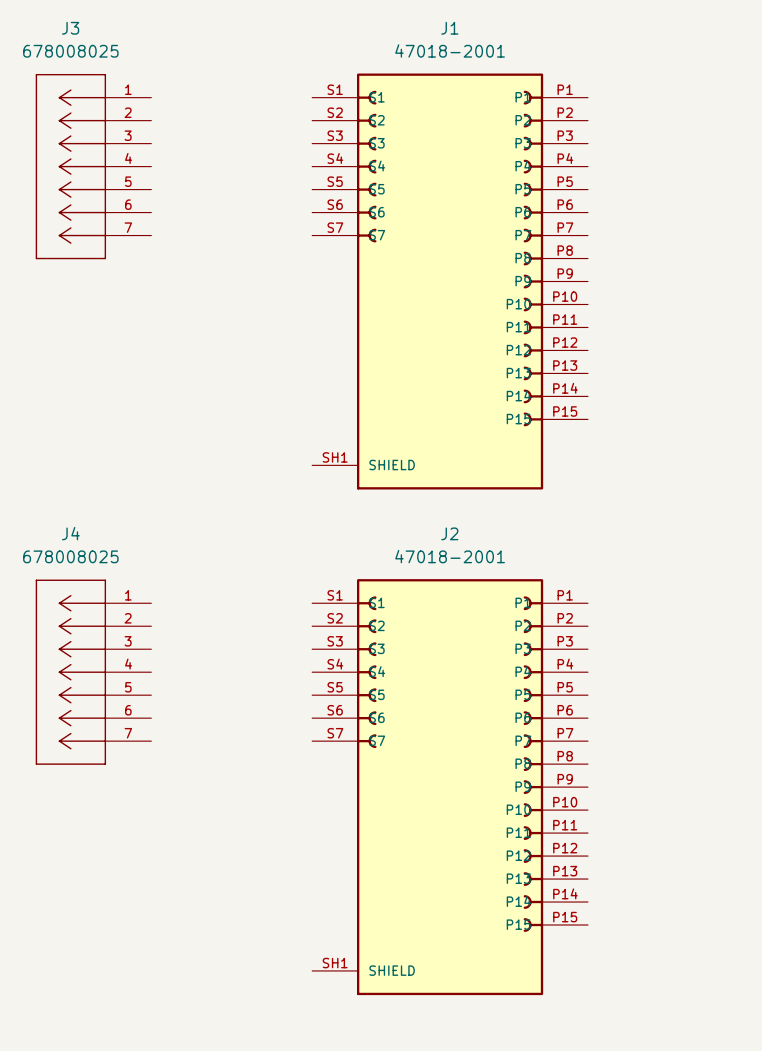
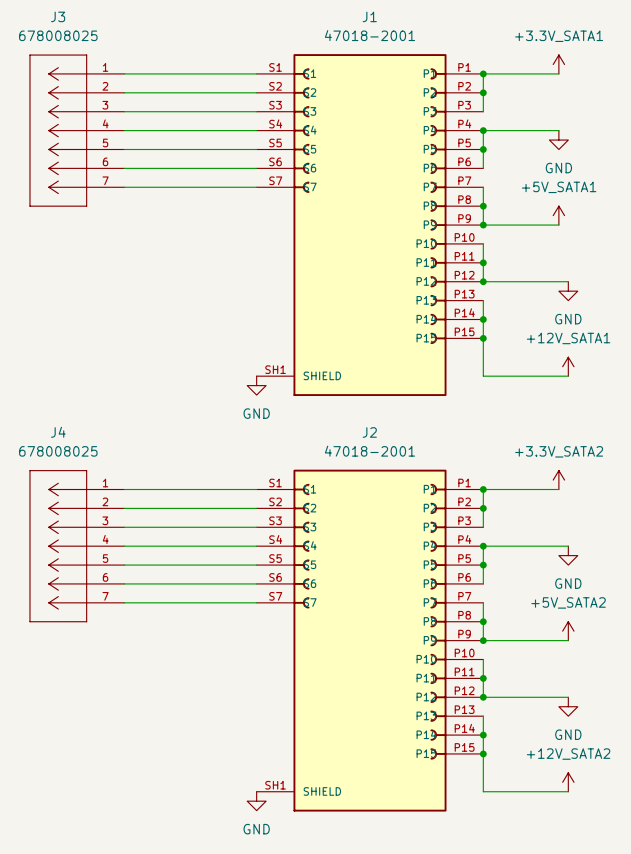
power symbol: none -> +3.3V_SATA1 (558, 64)
wire: none -> (124, 73) (256, 73)
junction: none -> (483, 73)
wire: none -> (558, 73) (483, 73) (483, 111)
wire: none -> (124, 92) (256, 92)
junction: none -> (483, 92)
wire: none -> (124, 111) (256, 111)
wire: none -> (124, 130) (256, 130)
junction: none -> (483, 130)
wire: none -> (558, 130) (483, 130) (483, 168)
power symbol: none -> GND (558, 140)
wire: none -> (124, 149) (256, 149)
junction: none -> (483, 149)
wire: none -> (124, 168) (256, 168)
wire: none -> (124, 187) (256, 187)
wire: none -> (483, 187) (483, 225) (558, 225)
junction: none -> (483, 206)
power symbol: none -> +5V_SATA1 (558, 215)
junction: none -> (483, 225)
wire: none -> (483, 243) (483, 281) (568, 281)
junction: none -> (483, 262)
junction: none -> (483, 281)
power symbol: none -> GND (568, 291)
wire: none -> (483, 300) (483, 376) (568, 376)
junction: none -> (483, 319)
junction: none -> (483, 338)
power symbol: none -> +12V_SATA1 (568, 366)
power symbol: none -> GND (256, 385)
power symbol: none -> +3.3V_SATA2 (558, 480)
wire: none -> (124, 489) (256, 489)
junction: none -> (483, 489)
wire: none -> (558, 489) (483, 489) (483, 527)
wire: none -> (124, 508) (256, 508)
junction: none -> (483, 508)
wire: none -> (124, 527) (256, 527)
wire: none -> (124, 546) (256, 546)
junction: none -> (483, 546)
wire: none -> (568, 546) (483, 546) (483, 583)
power symbol: none -> GND (568, 555)
wire: none -> (124, 565) (256, 565)
junction: none -> (483, 565)
wire: none -> (124, 583) (256, 583)
wire: none -> (124, 602) (256, 602)
wire: none -> (483, 602) (483, 640) (568, 640)
junction: none -> (483, 621)
power symbol: none -> +5V_SATA2 (568, 631)
junction: none -> (483, 640)
wire: none -> (483, 659) (483, 697) (568, 697)
junction: none -> (483, 678)
junction: none -> (483, 697)
power symbol: none -> GND (568, 706)
wire: none -> (483, 716) (483, 791) (568, 791)
junction: none -> (483, 735)
junction: none -> (483, 753)
power symbol: none -> +12V_SATA2 (568, 782)
power symbol: none -> GND (256, 801)

